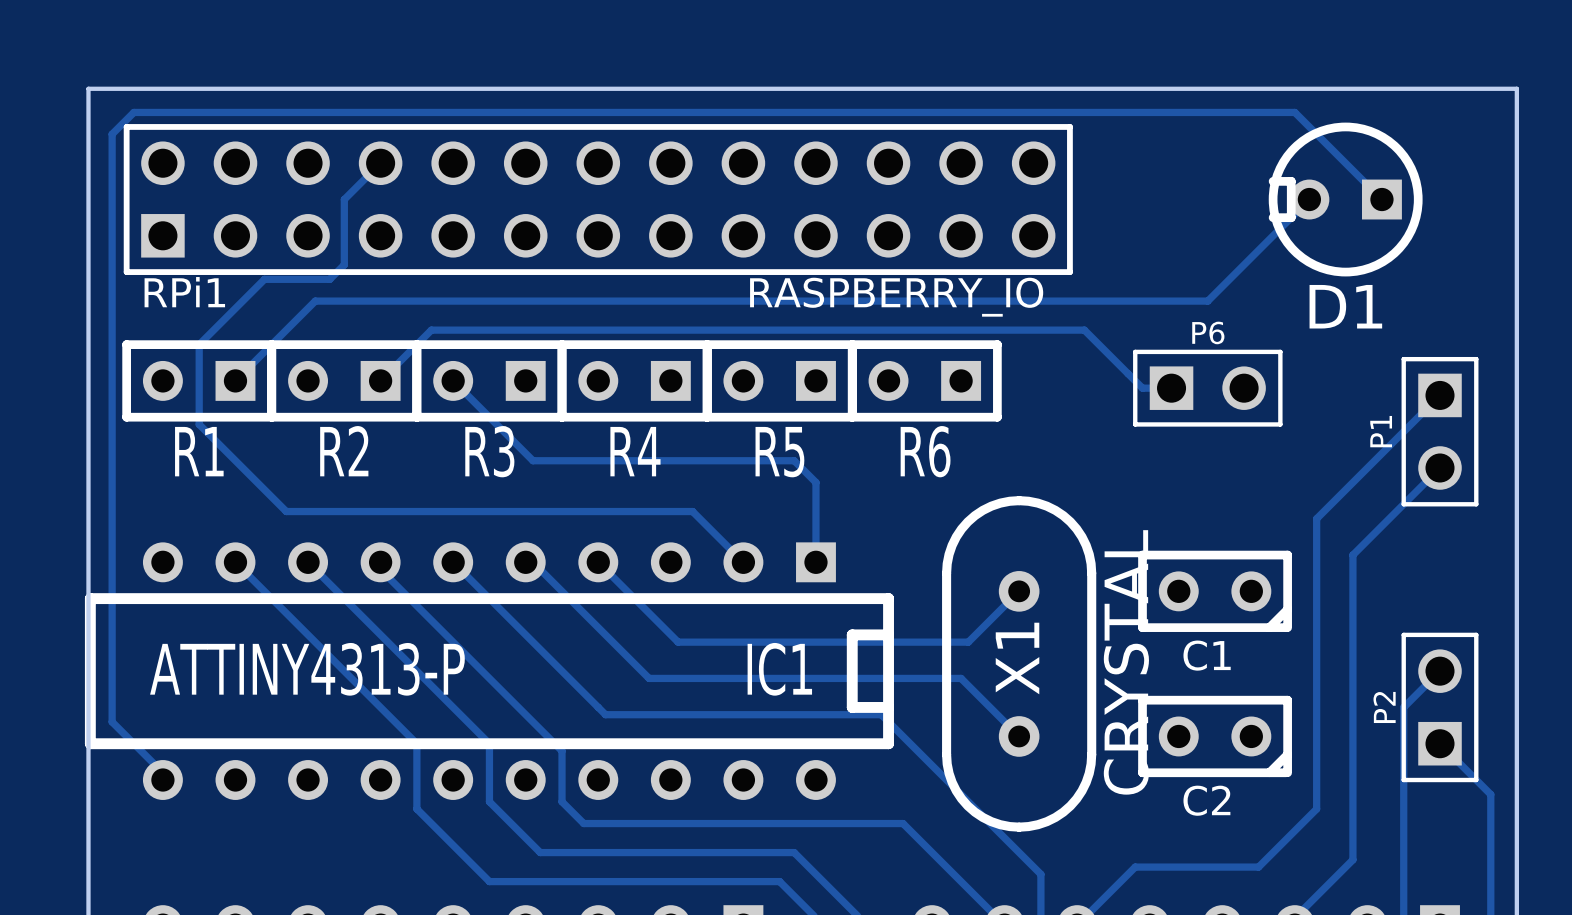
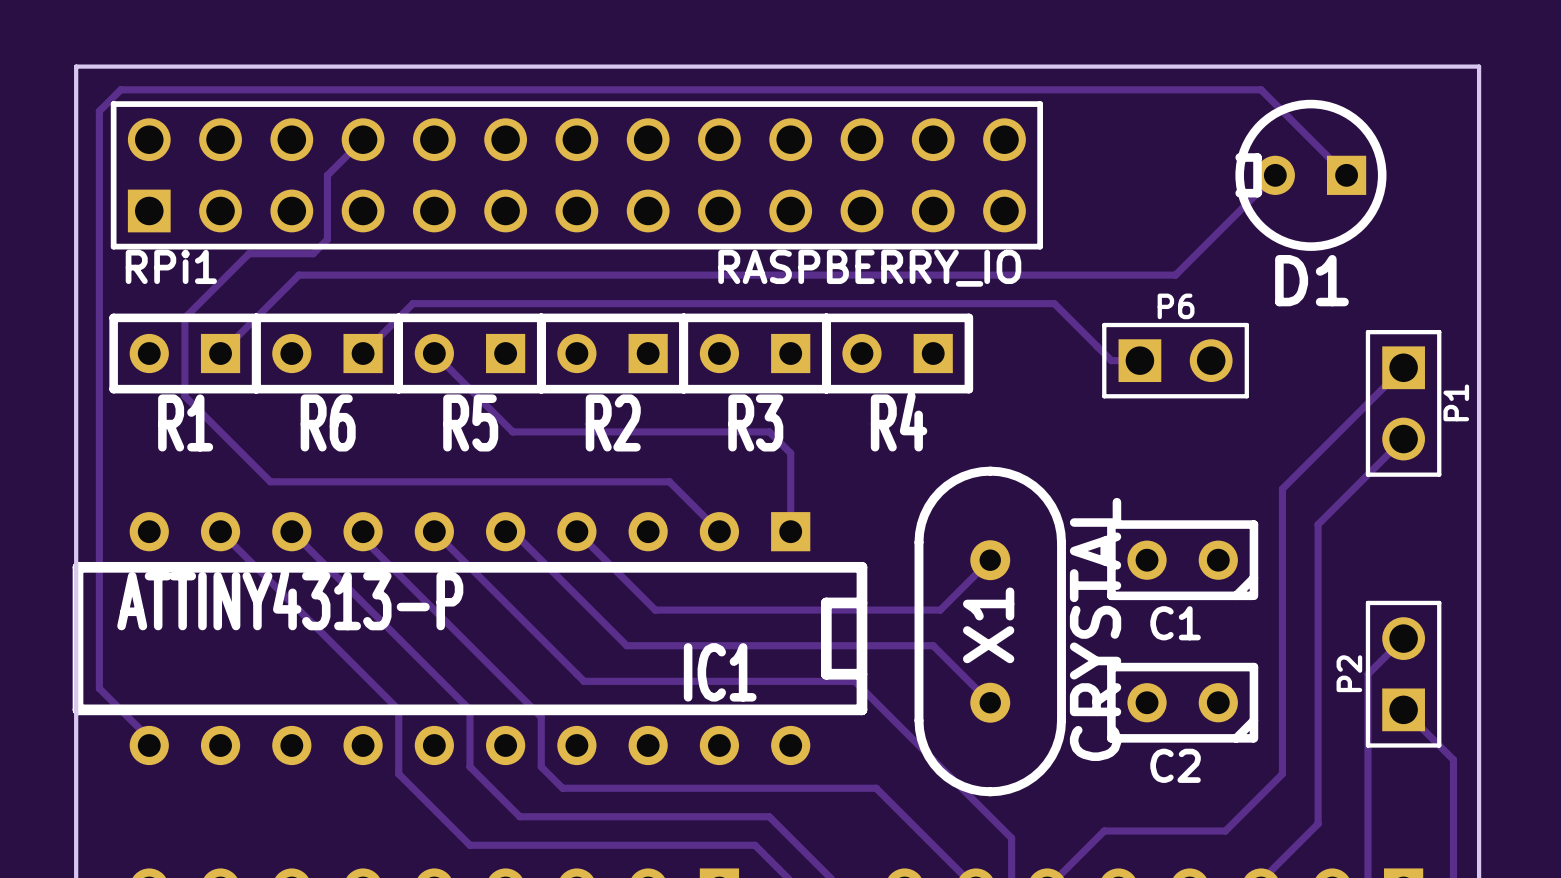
P1 name position: P1 (1381, 431) -> P1 (1456, 402)
R2 name position: R2 (344, 451) -> R2 (613, 422)
R3 name position: R3 (489, 451) -> R3 (755, 422)
R4 name position: R4 (635, 451) -> R4 (899, 421)
R6 name position: R6 (925, 451) -> R6 (328, 422)
R5 name position: R5 (779, 452) -> R5 (470, 422)
IC1 value position: ATTINY4313-P (307, 669) -> ATTINY4313-P (290, 599)
IC1 name position: IC1 (779, 669) -> IC1 (720, 672)

